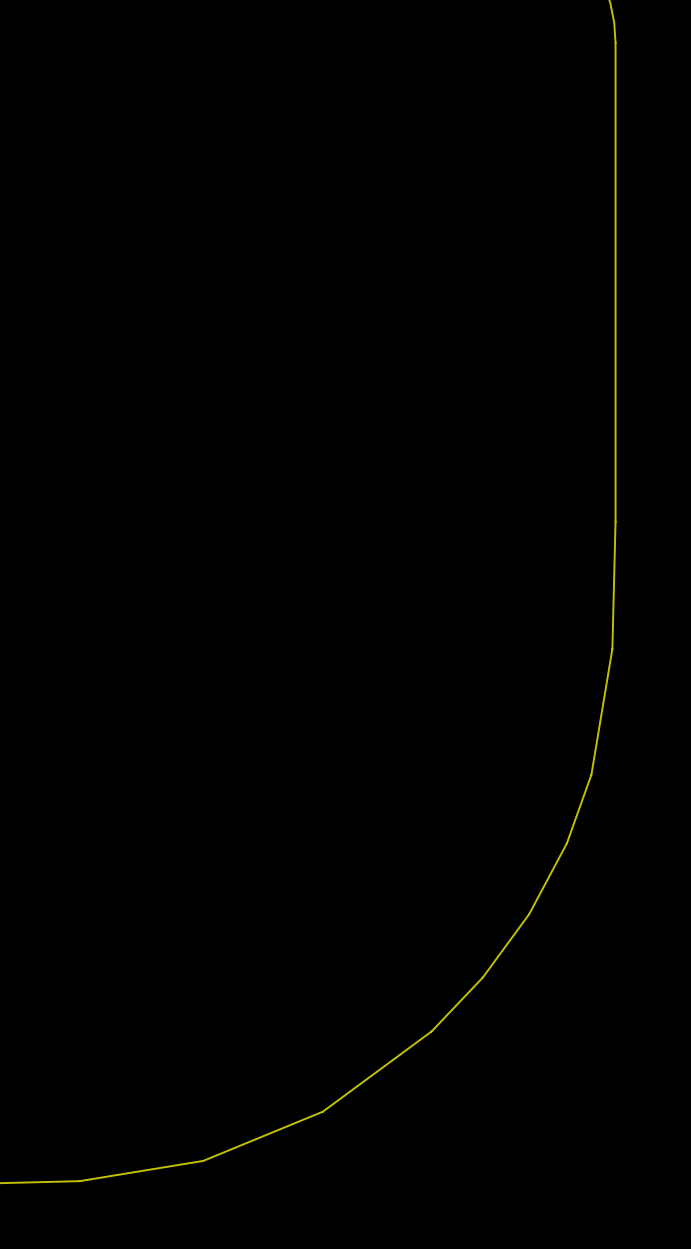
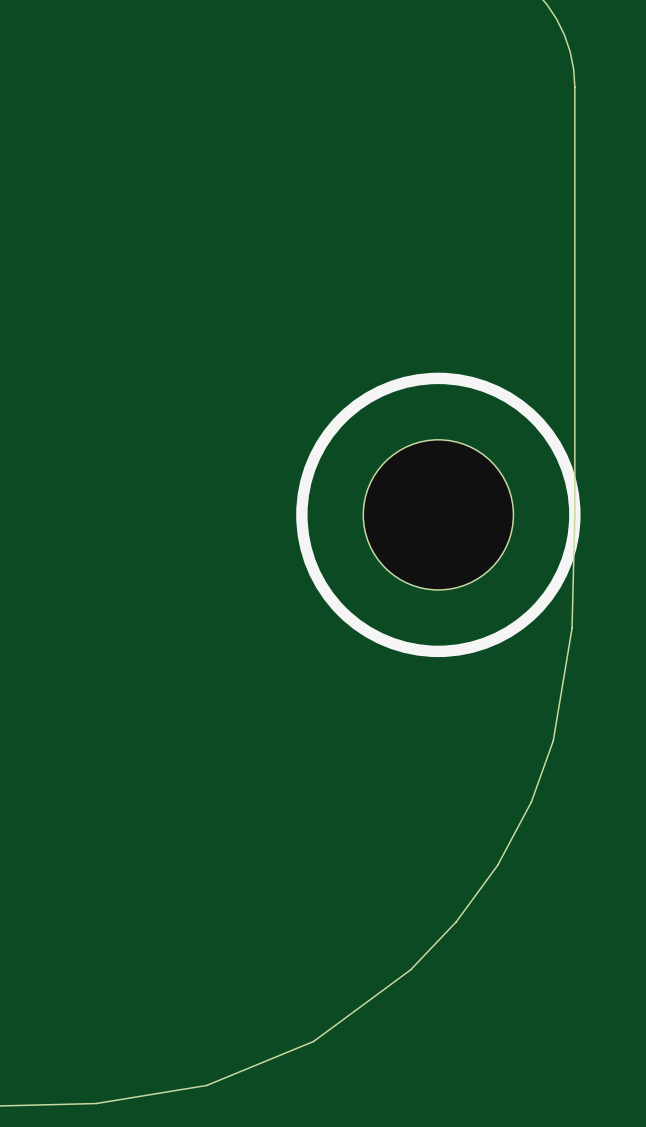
part: none -> (438, 514)

